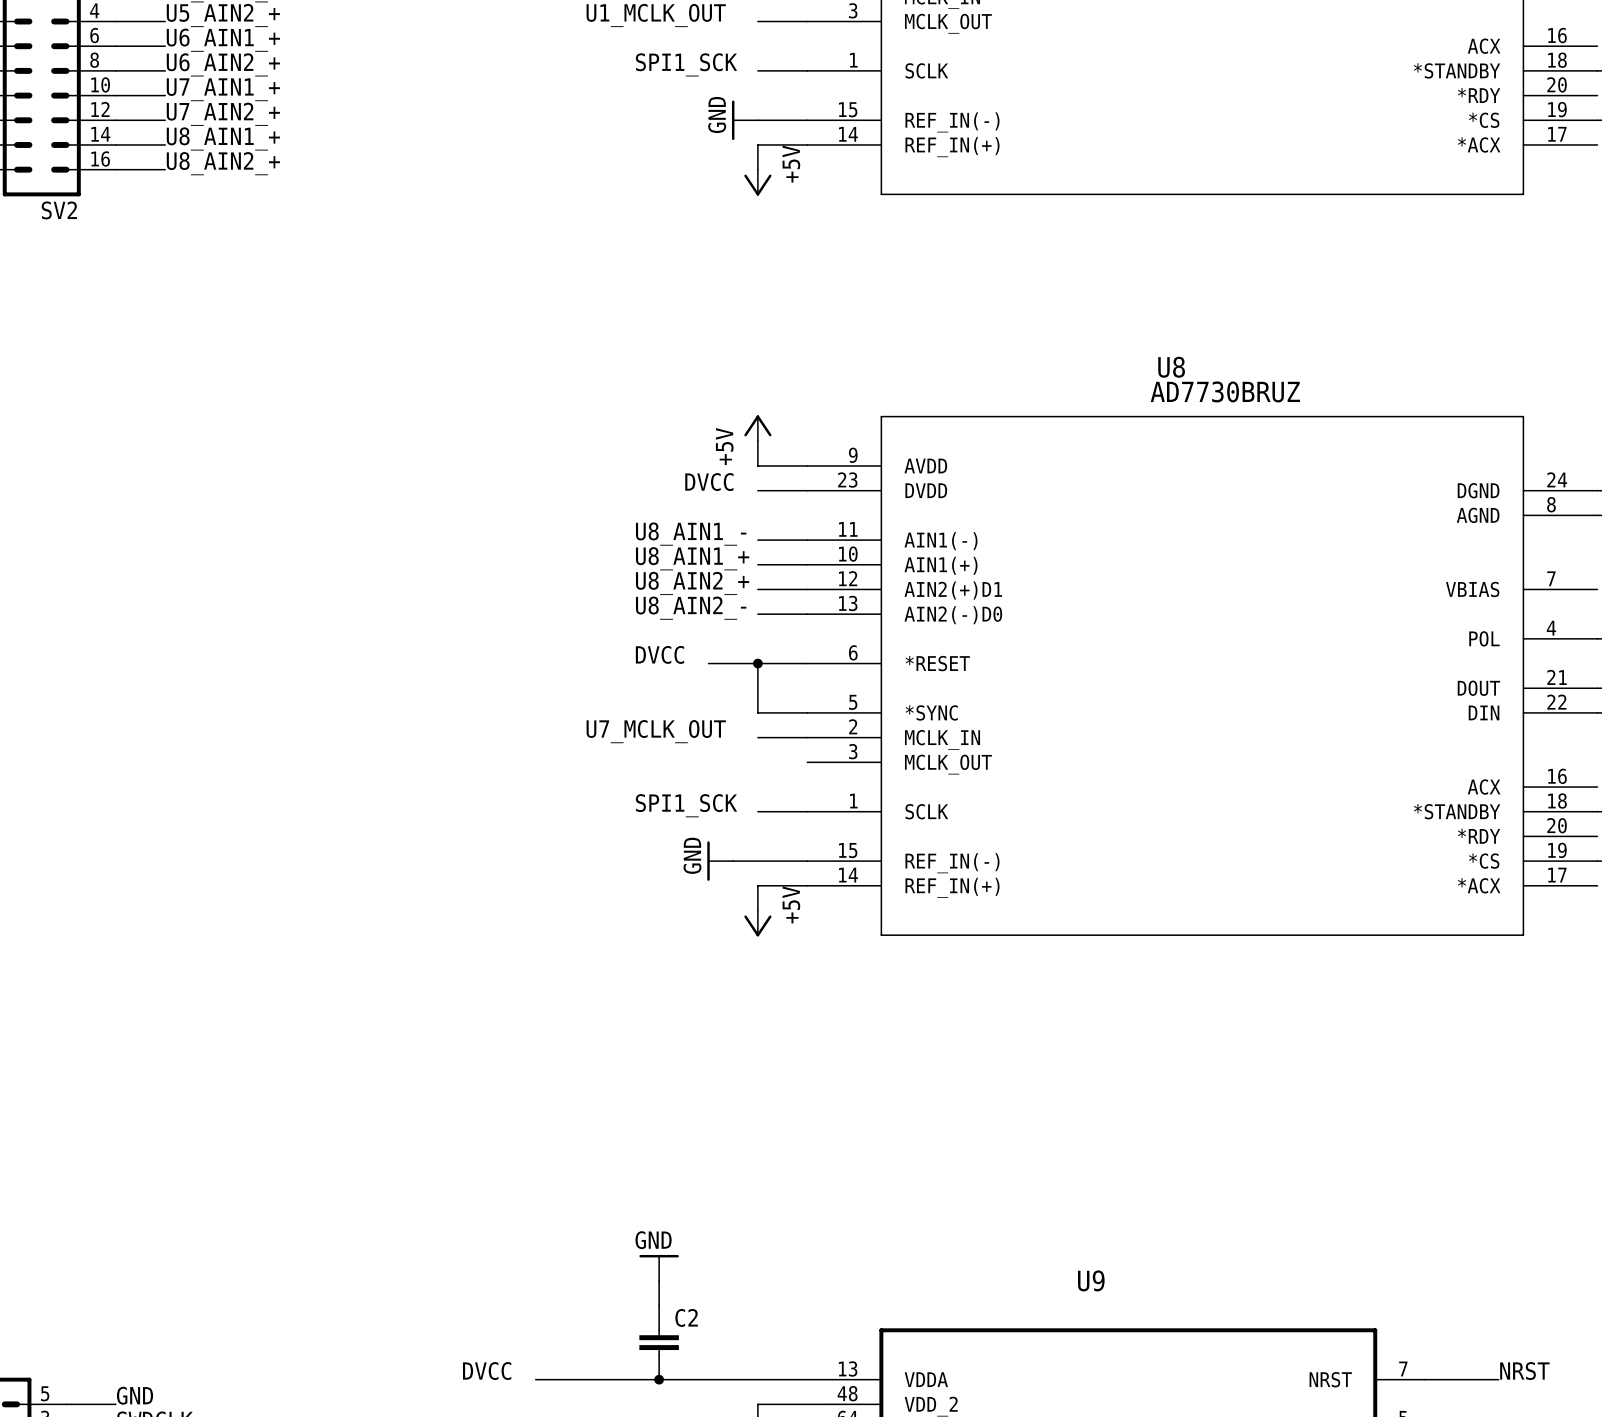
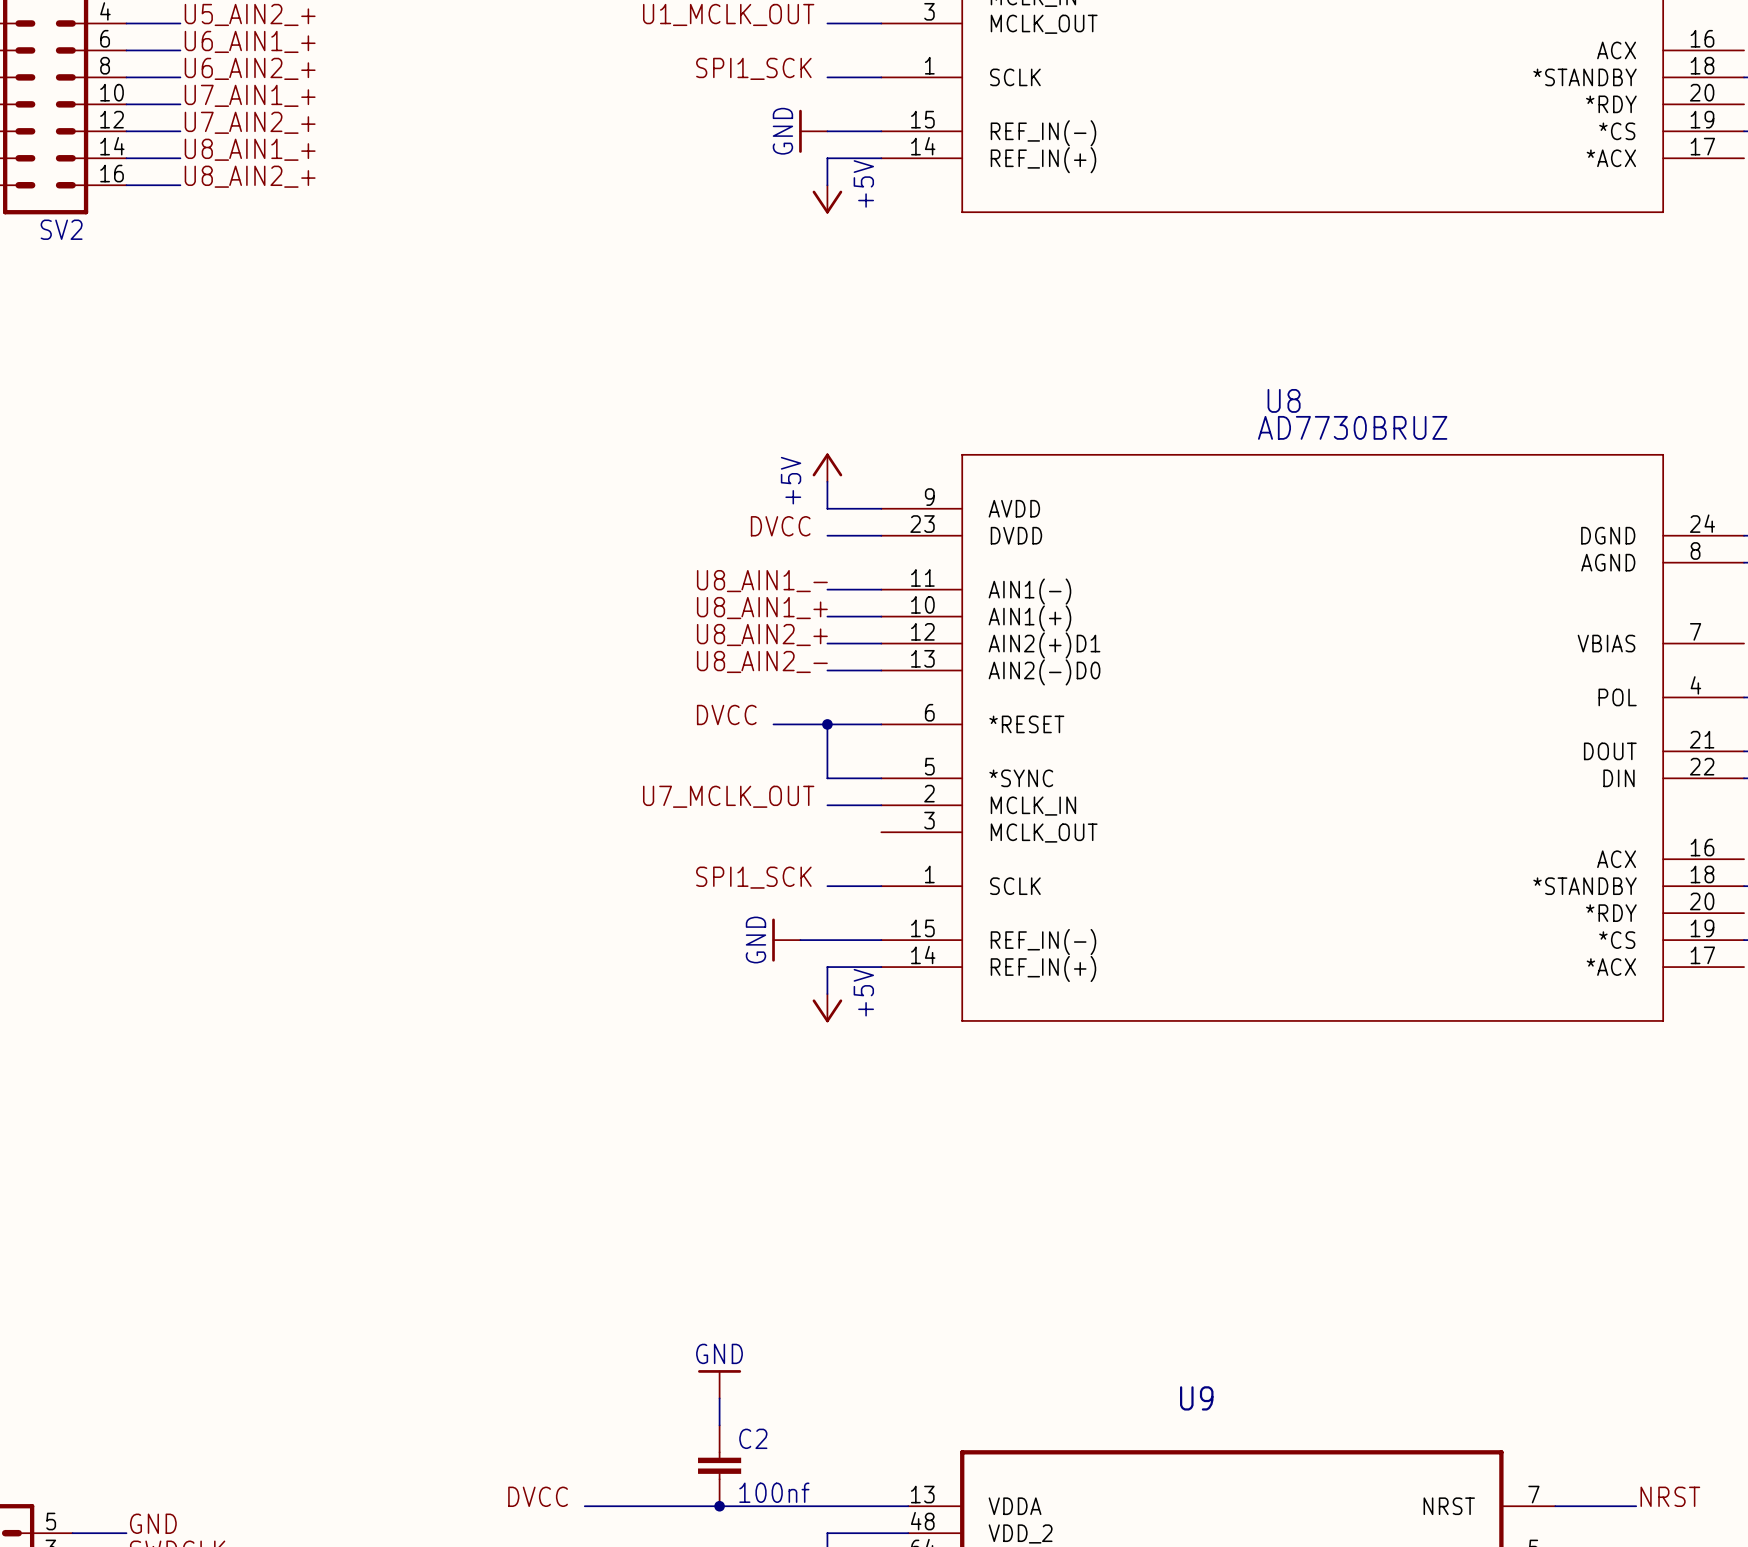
C2 value: none -> 100nf (774, 1492)

